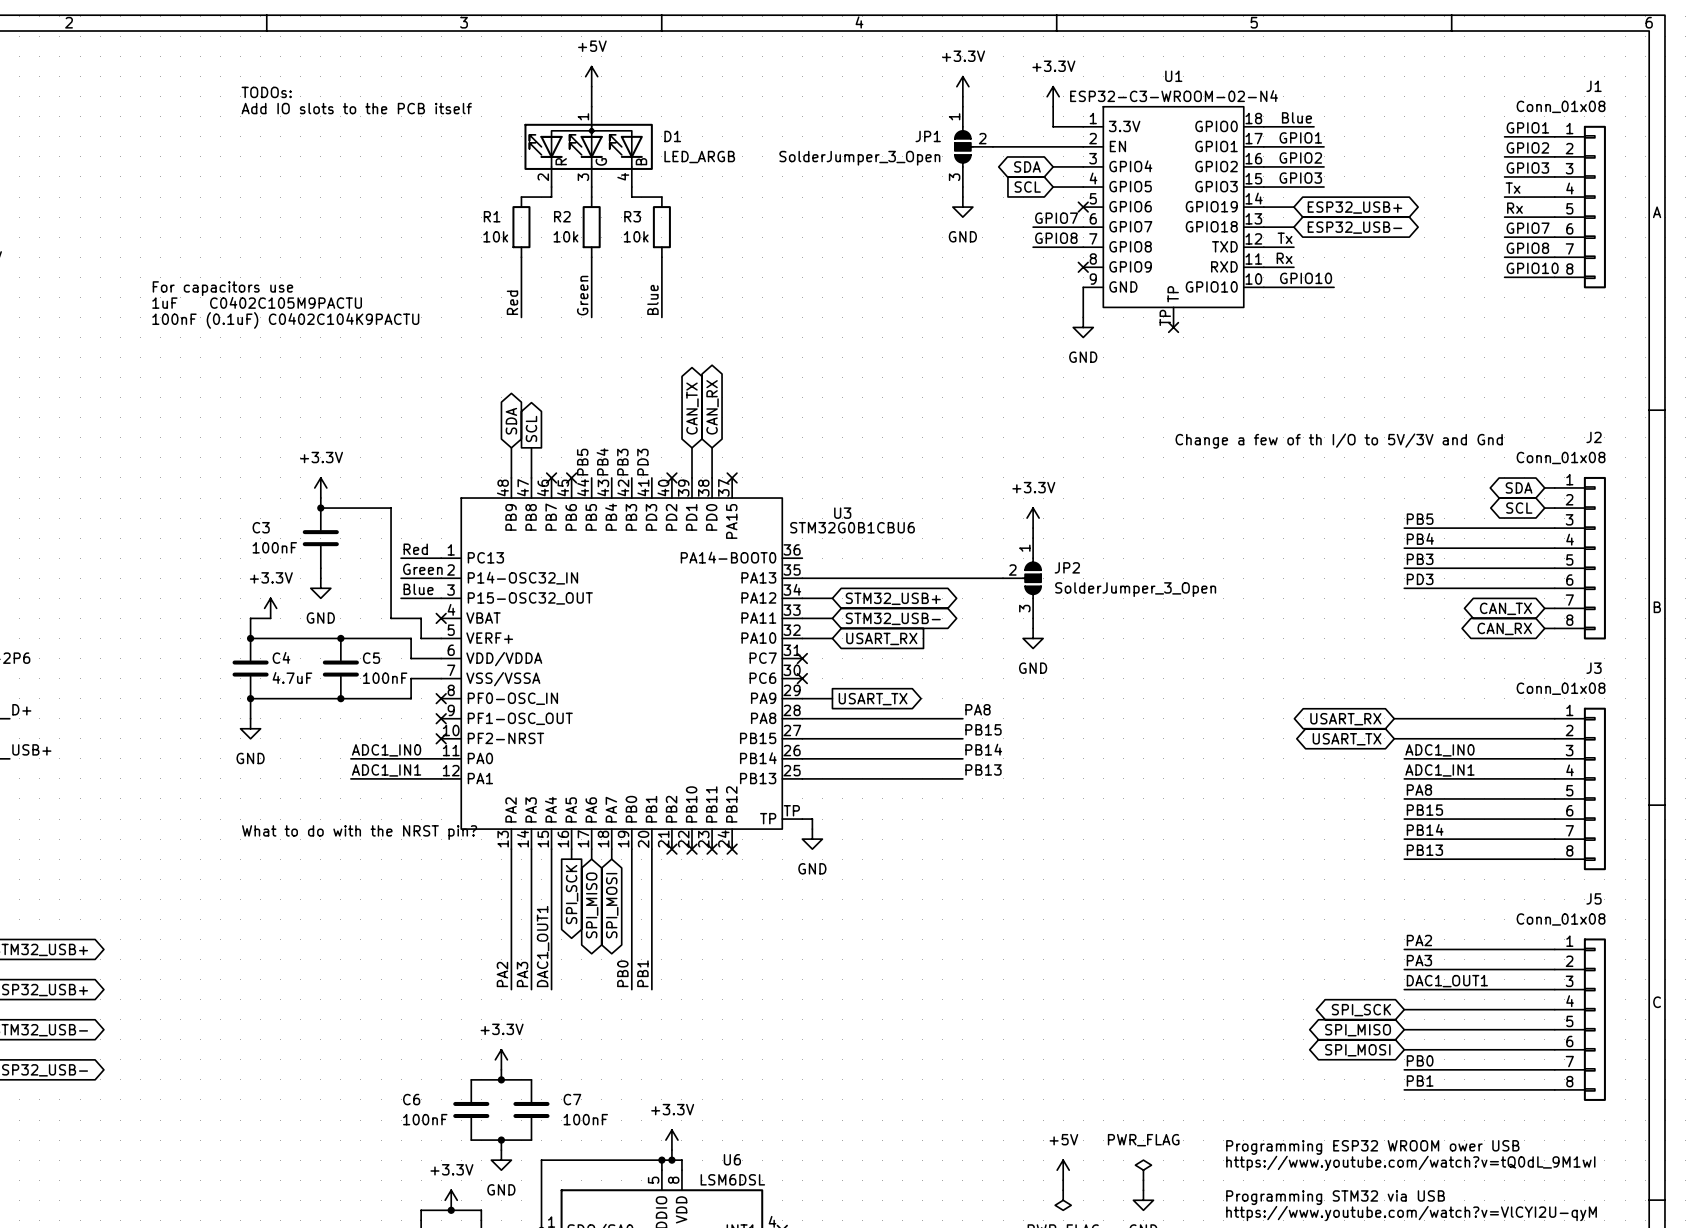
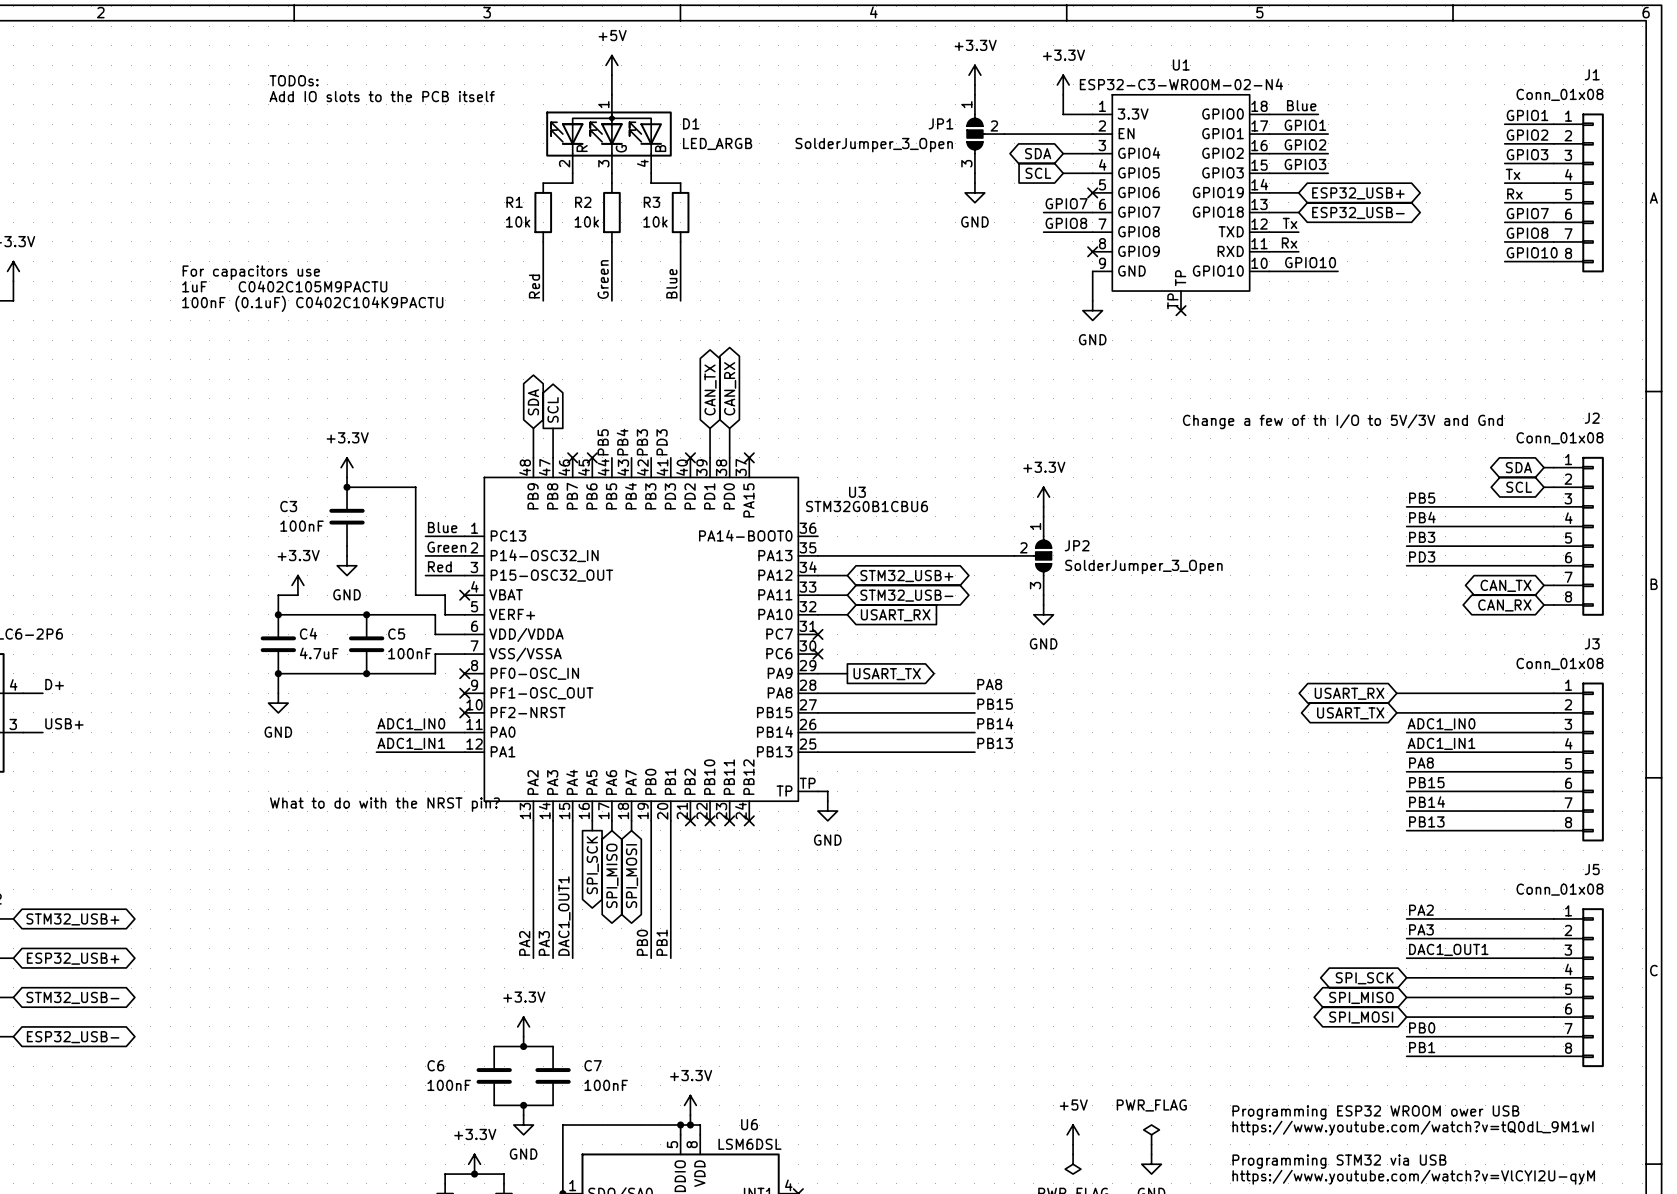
label: Red (415, 549) -> Blue (442, 527)
label: Blue (418, 589) -> Red (439, 566)

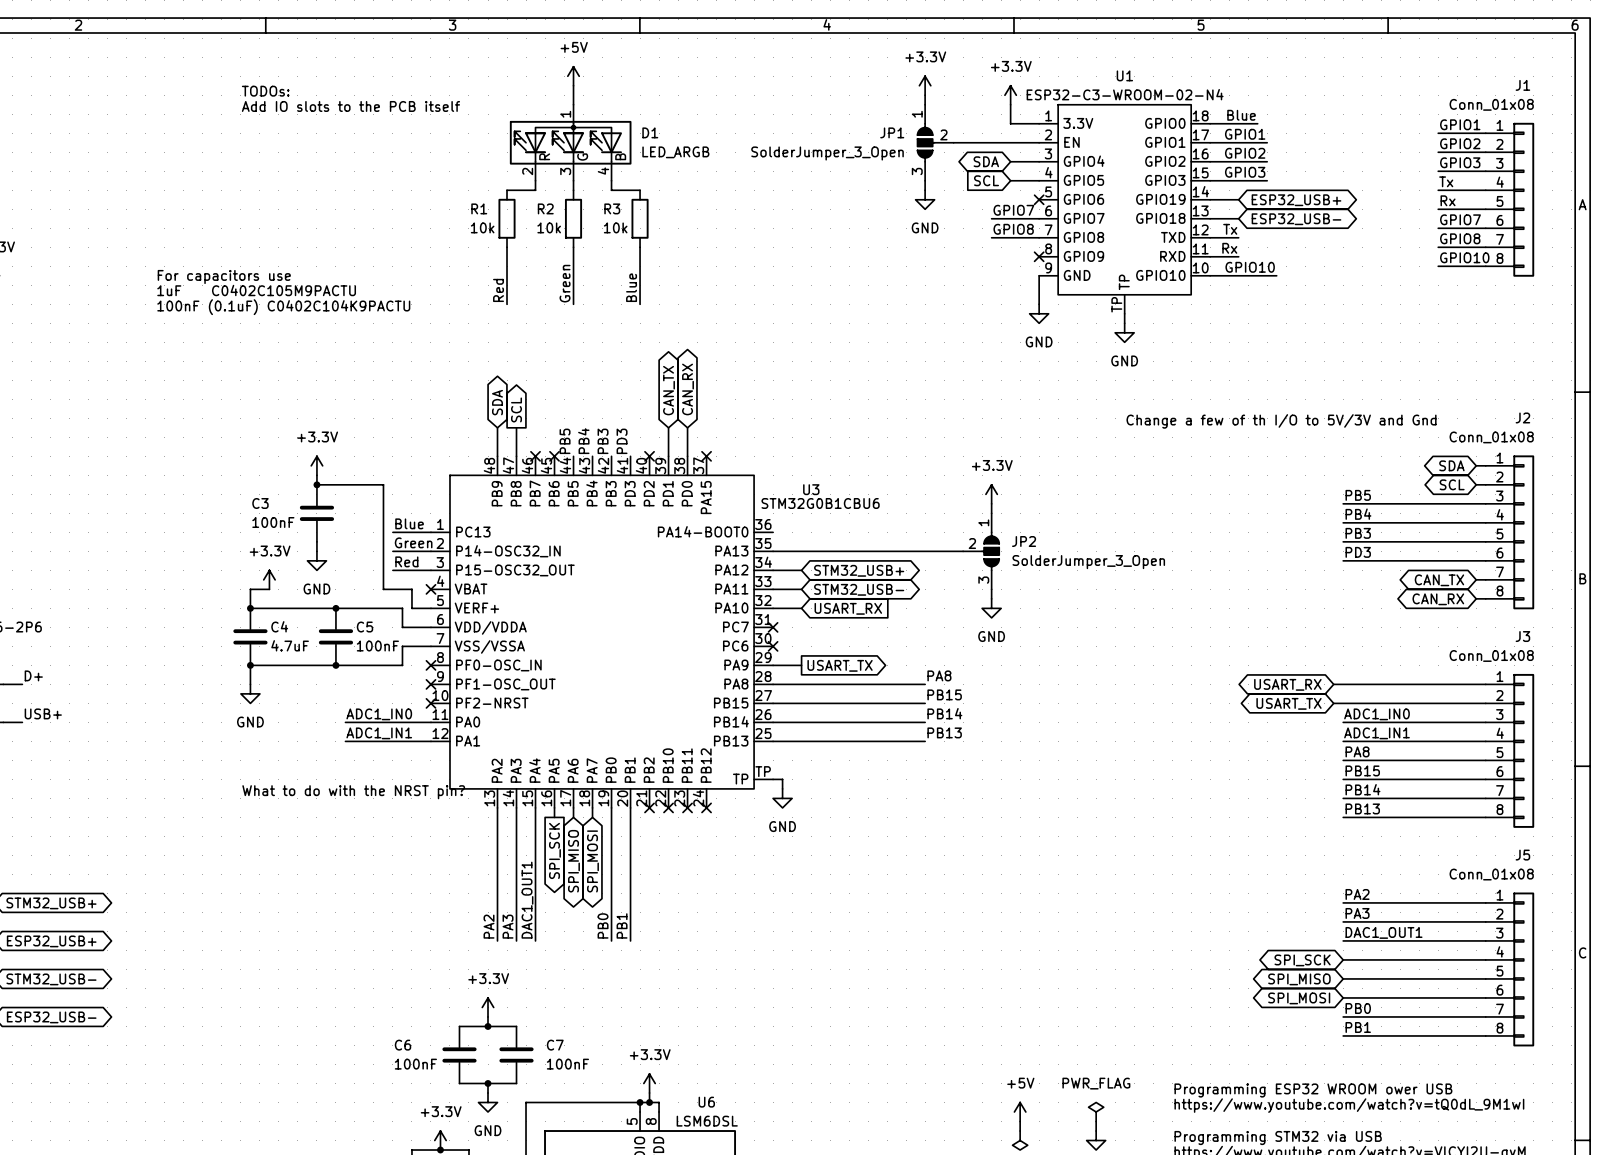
wire: none -> (1124, 313) (1124, 323)
no-connect mark: (1180, 310) -> none
power symbol: none -> GND (1124, 332)

